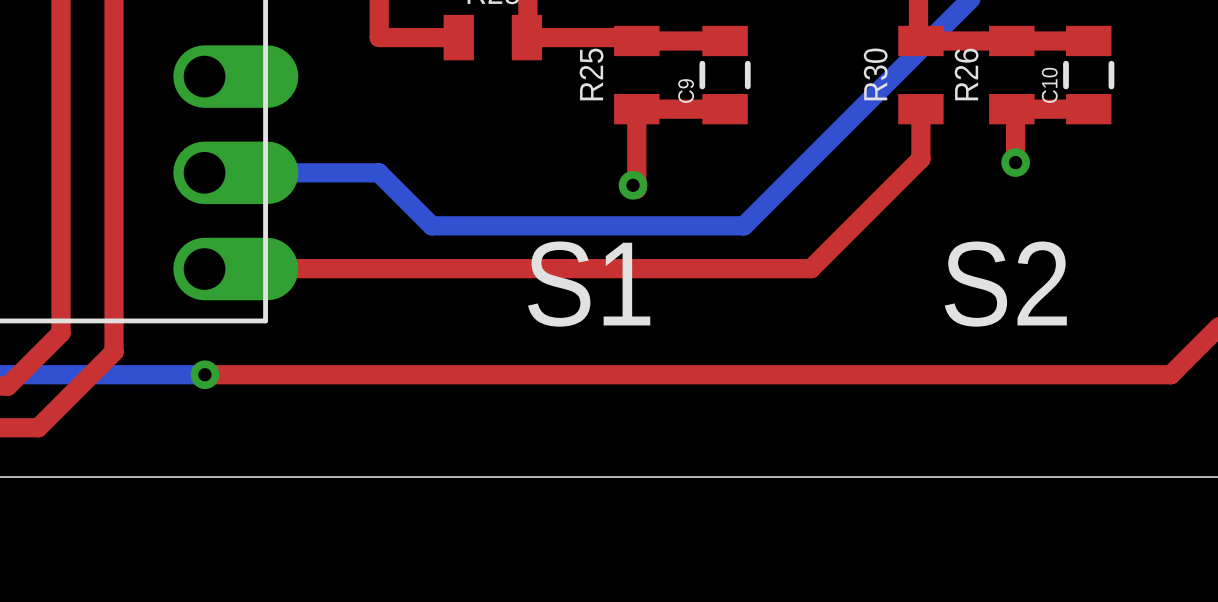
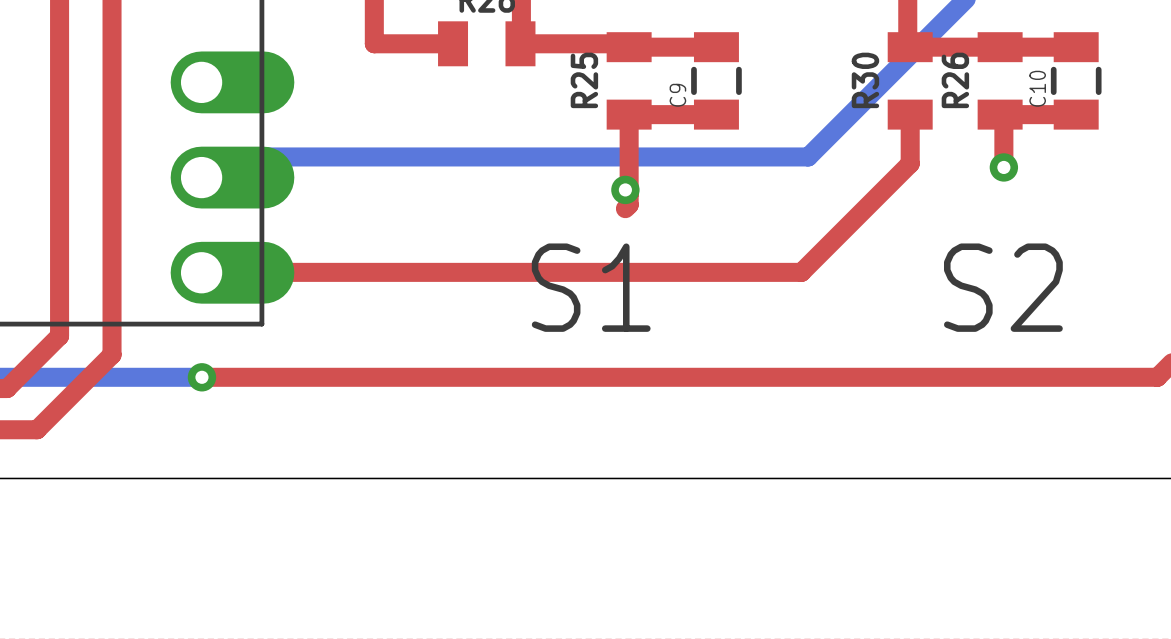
bottom track: (817, 151) (744, 225) (431, 225) (378, 172) (204, 172) -> (808, 156) (222, 156) (201, 177)
top track: none -> (629, 193) (629, 204) (625, 208)

